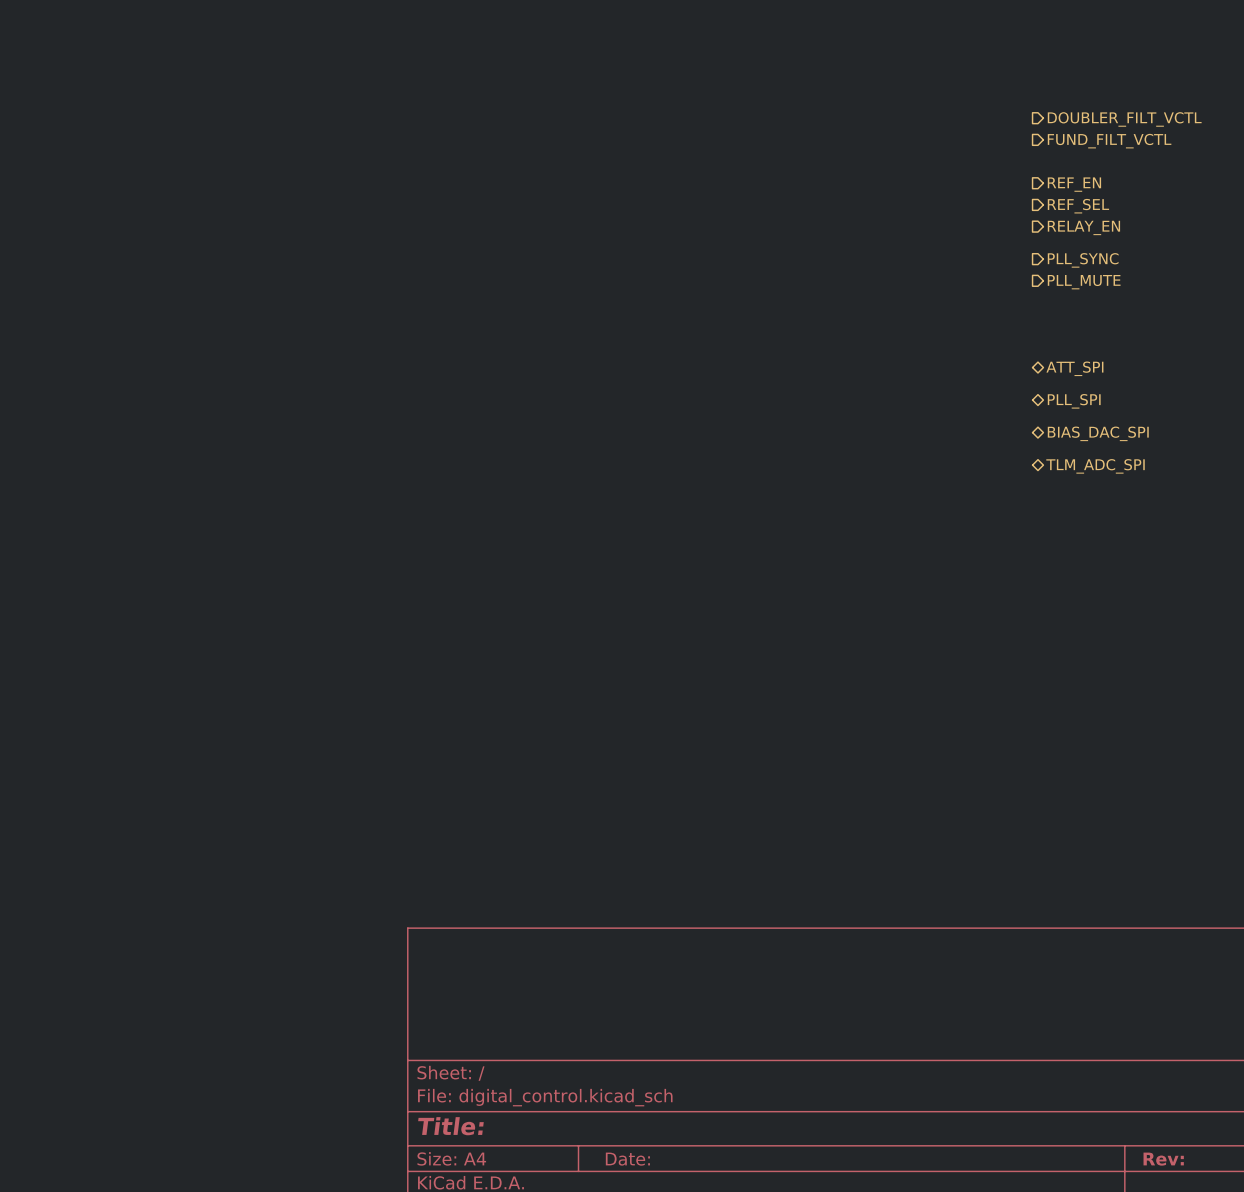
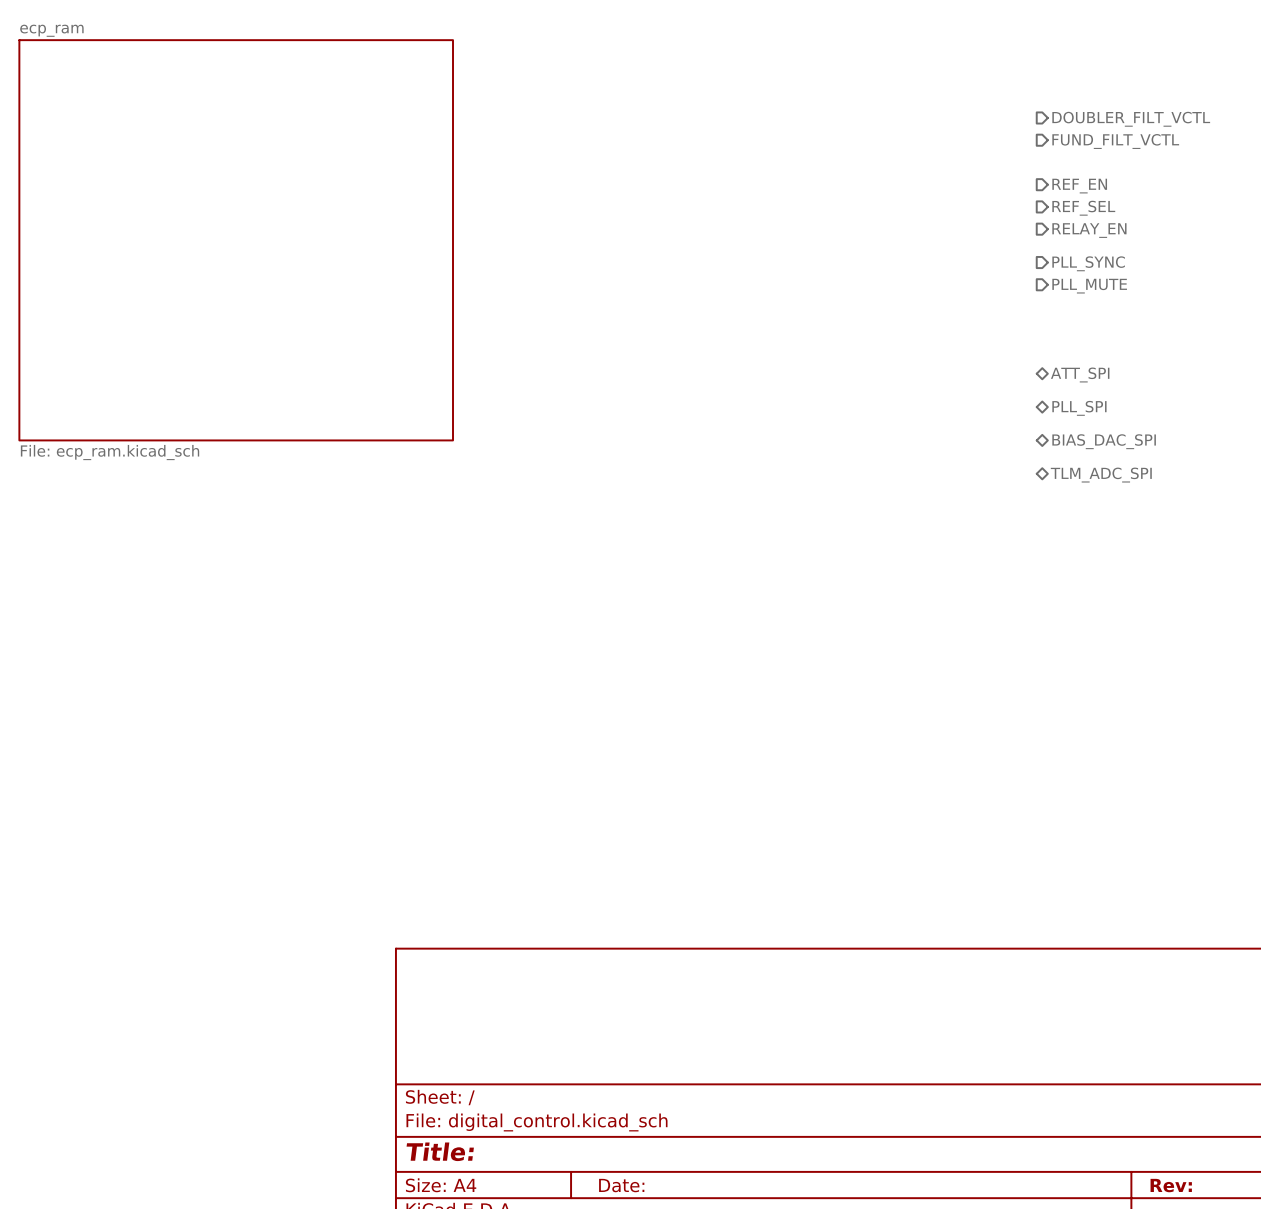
sheet ecp_ram: none -> File: ecp_ram.kicad_sch (236, 240)

